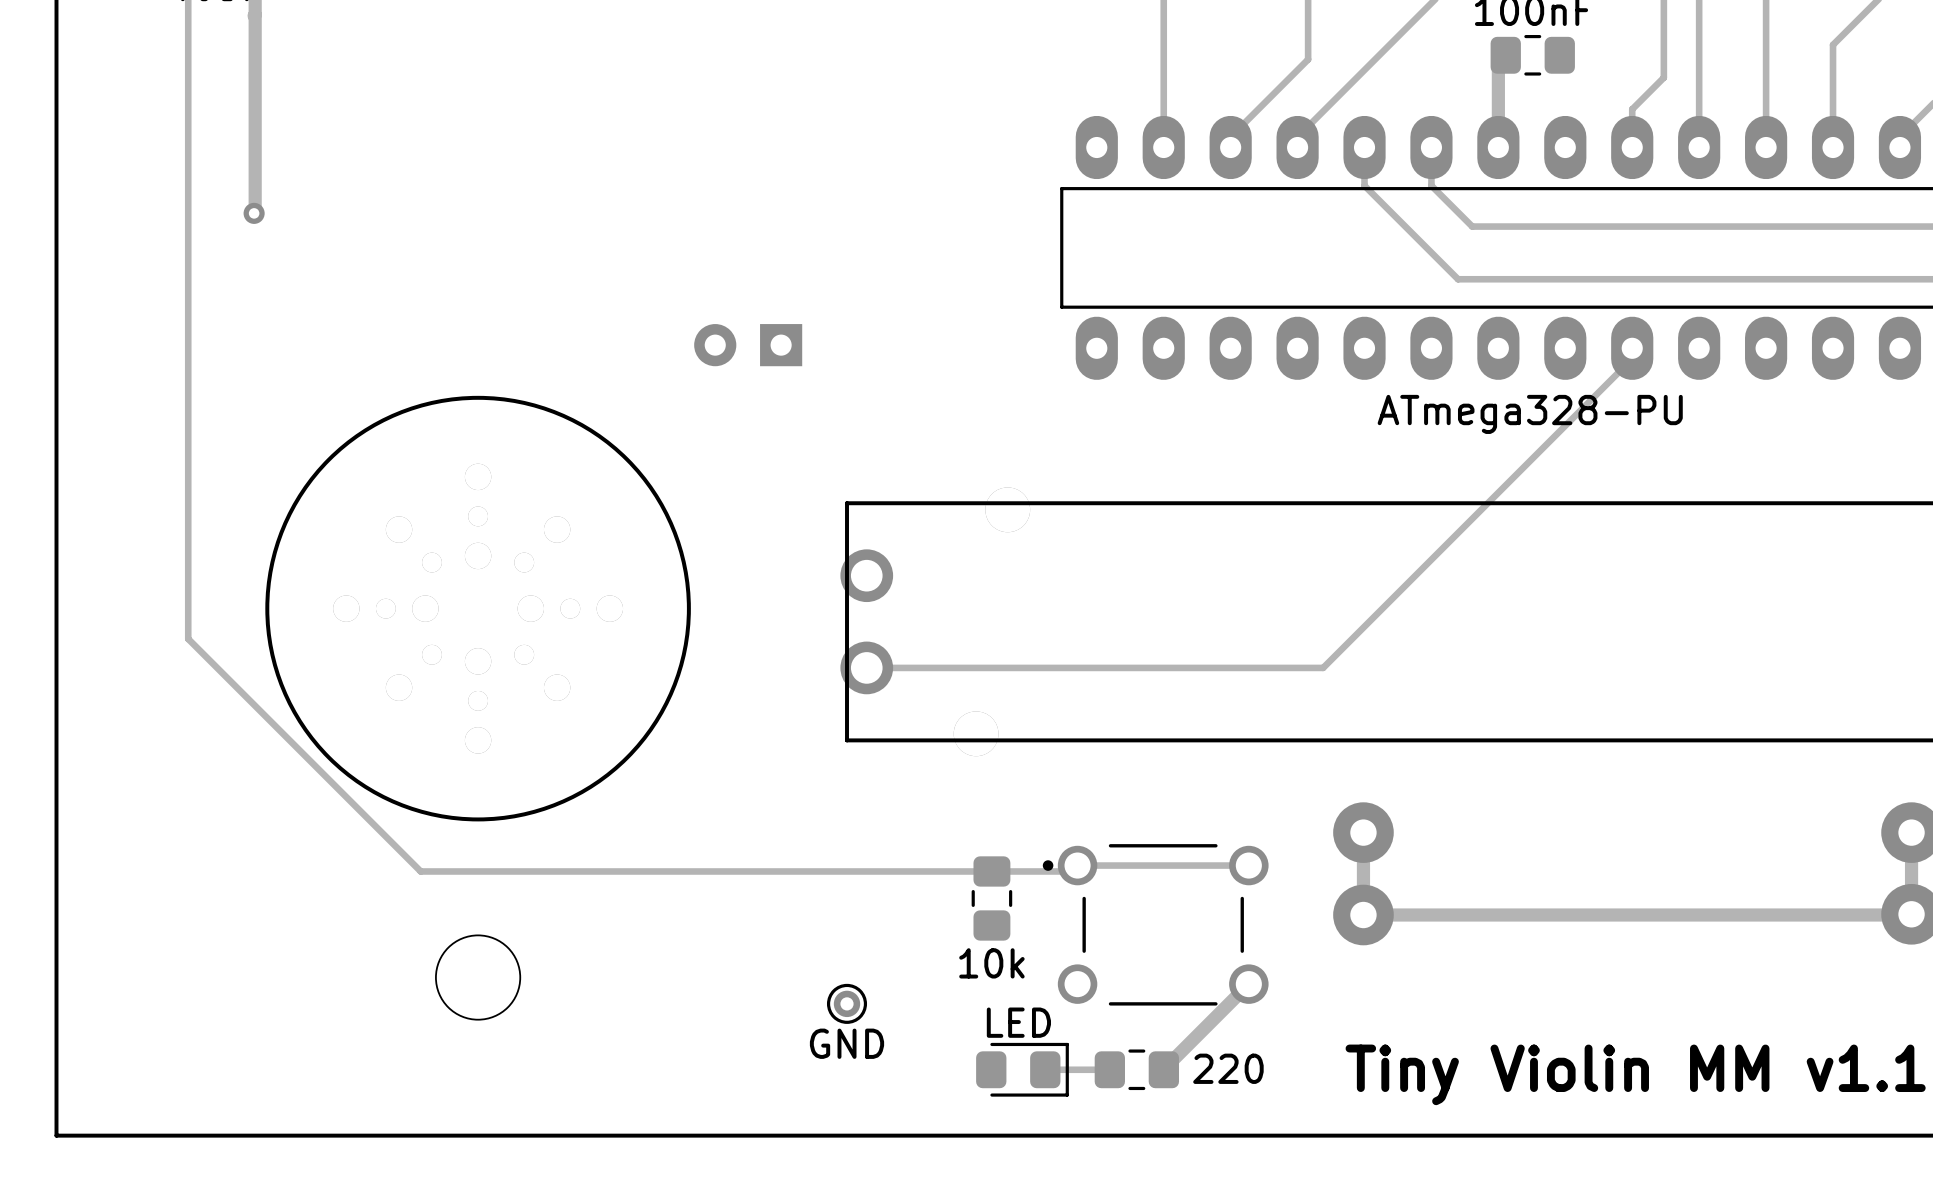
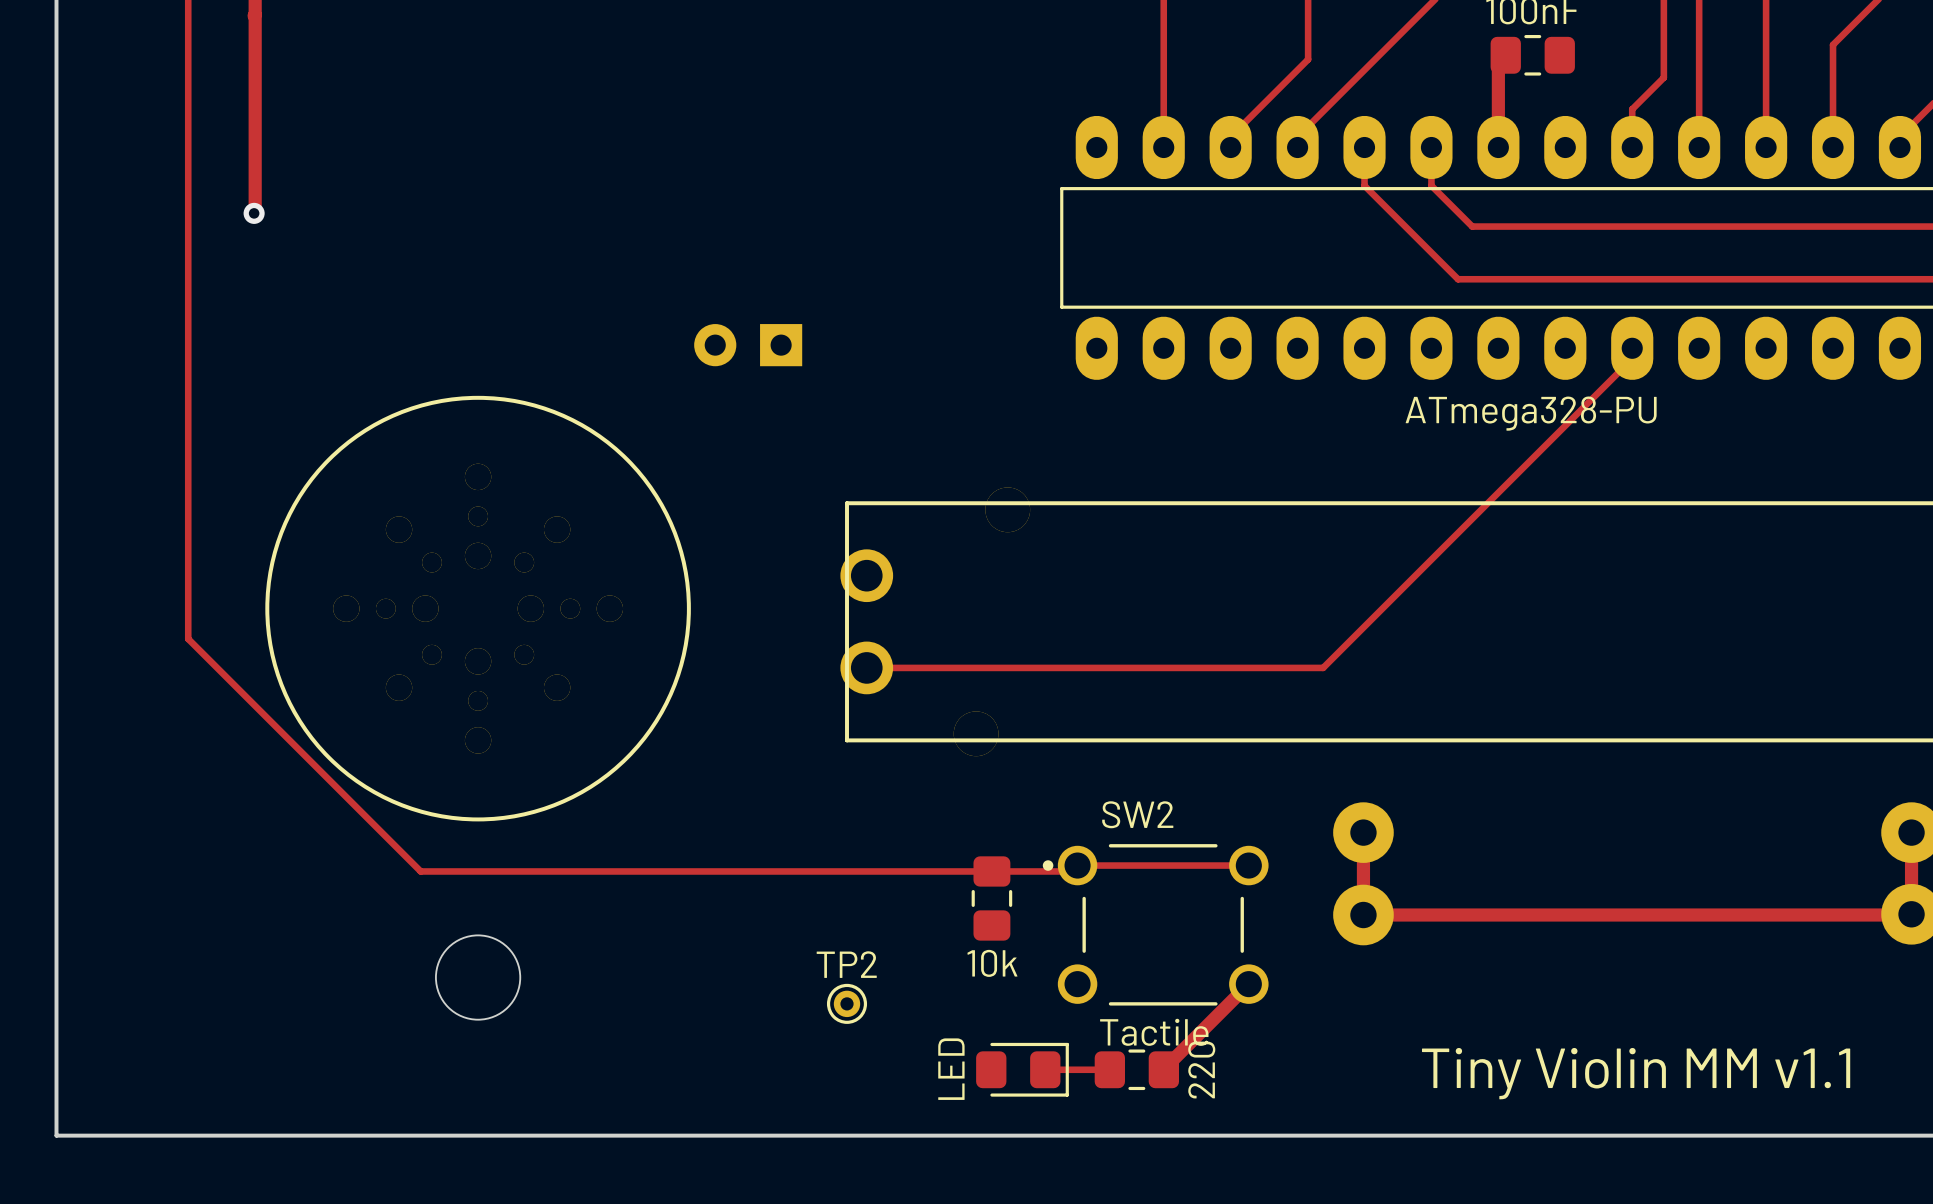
SW2 name: none -> SW2 (1137, 814)
TP2 name: none -> TP2 (846, 964)
part value rotation: 0° (1018, 1022) -> 90° counterclockwise (951, 1069)
SW2 value: none -> Tactile (1154, 1032)
TP2 value: GND (847, 1043) -> none
part value rotation: 0° (1228, 1068) -> 90° counterclockwise (1201, 1070)

